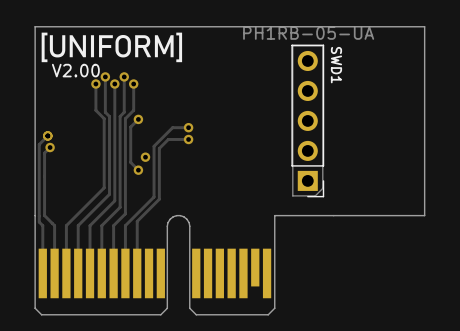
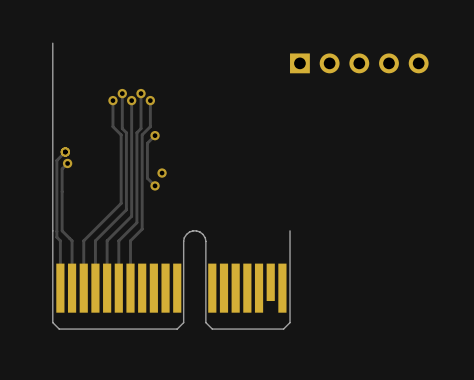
board edge: (35, 26) (424, 26) (424, 215) (274, 215) -> (52, 43) (52, 43)
drawing: [41, 32, 183, 63] -> none
text: V2.00 (75, 70) -> none
SWD1 side: bottom (307, 120) -> top (359, 63)
track: (188, 127) (172, 127) (154, 146) (154, 197) (125, 225) (125, 273) -> none
via: (188, 127) -> none
track: (188, 139) (168, 139) (159, 148) (159, 199) (137, 221) (137, 273) -> none
via: (188, 139) -> none

